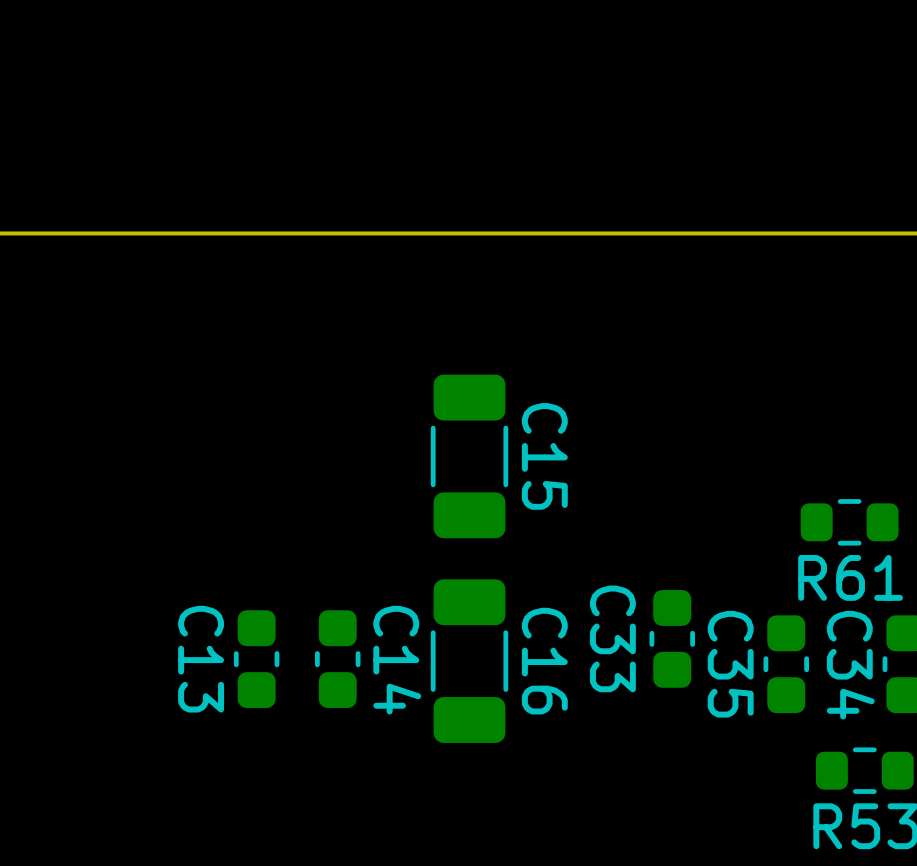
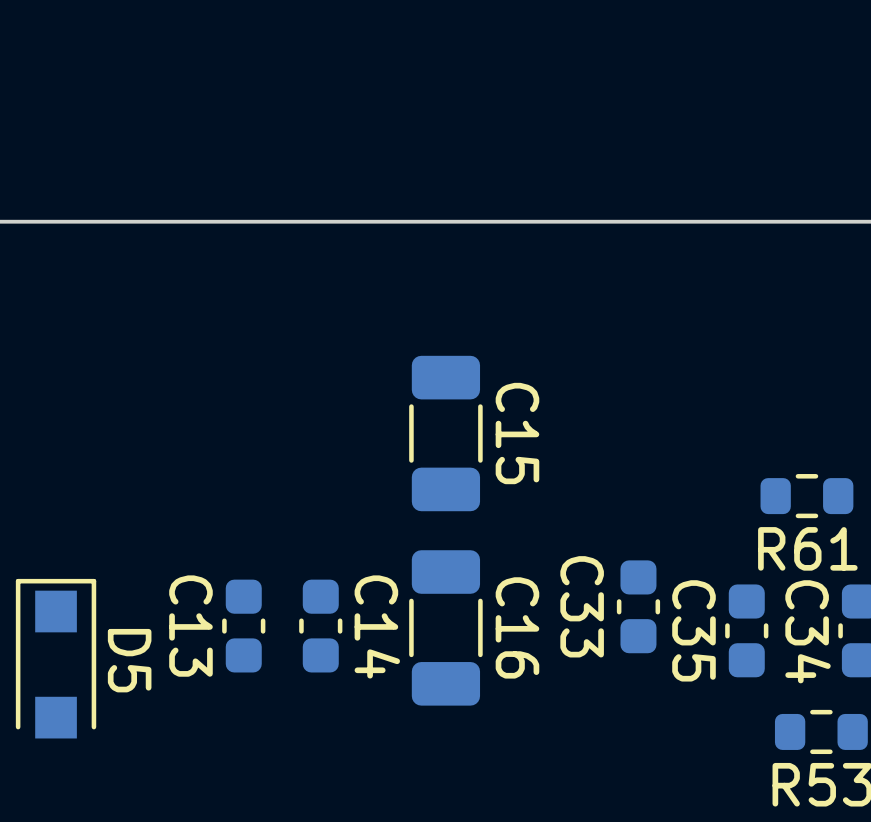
D5: none -> (56, 658)

